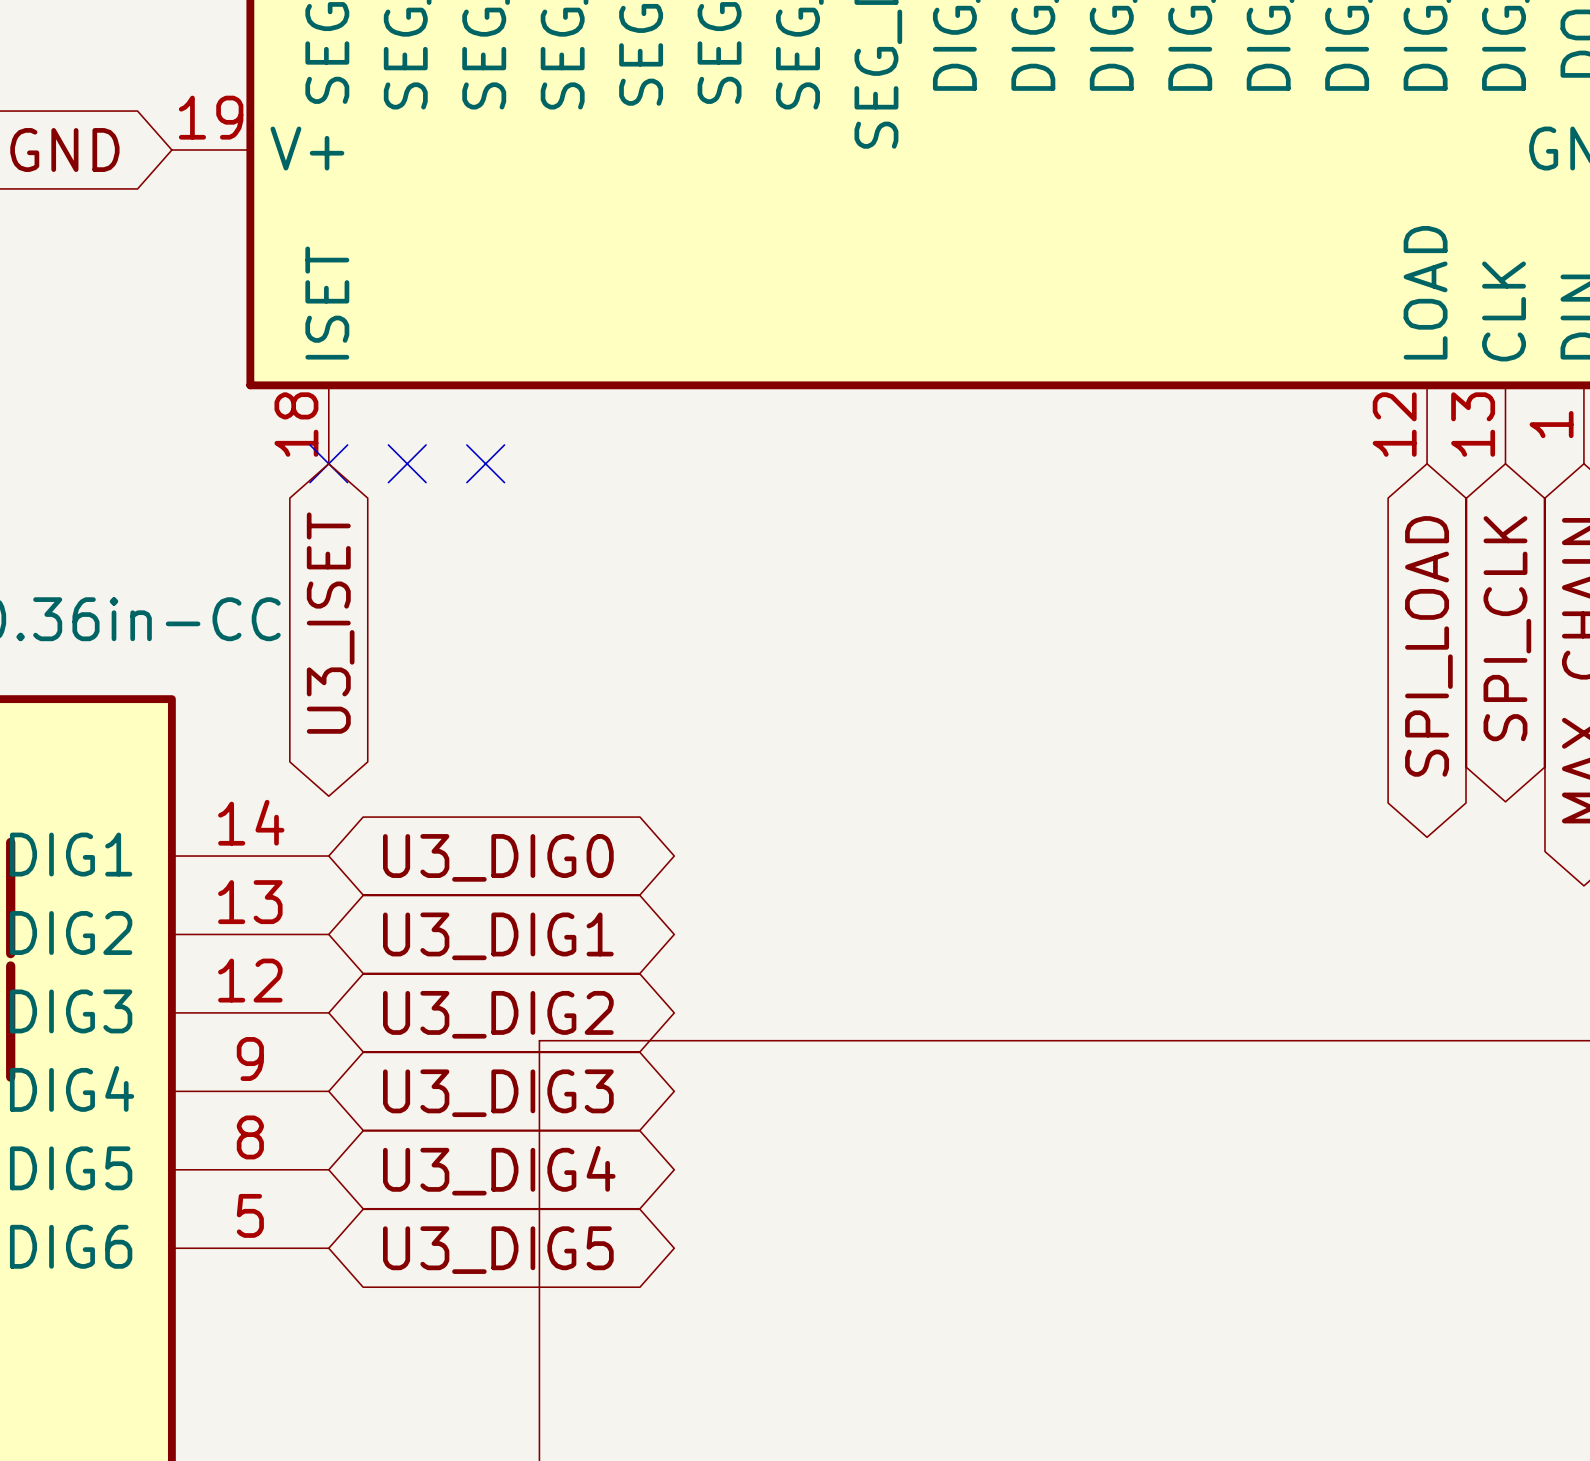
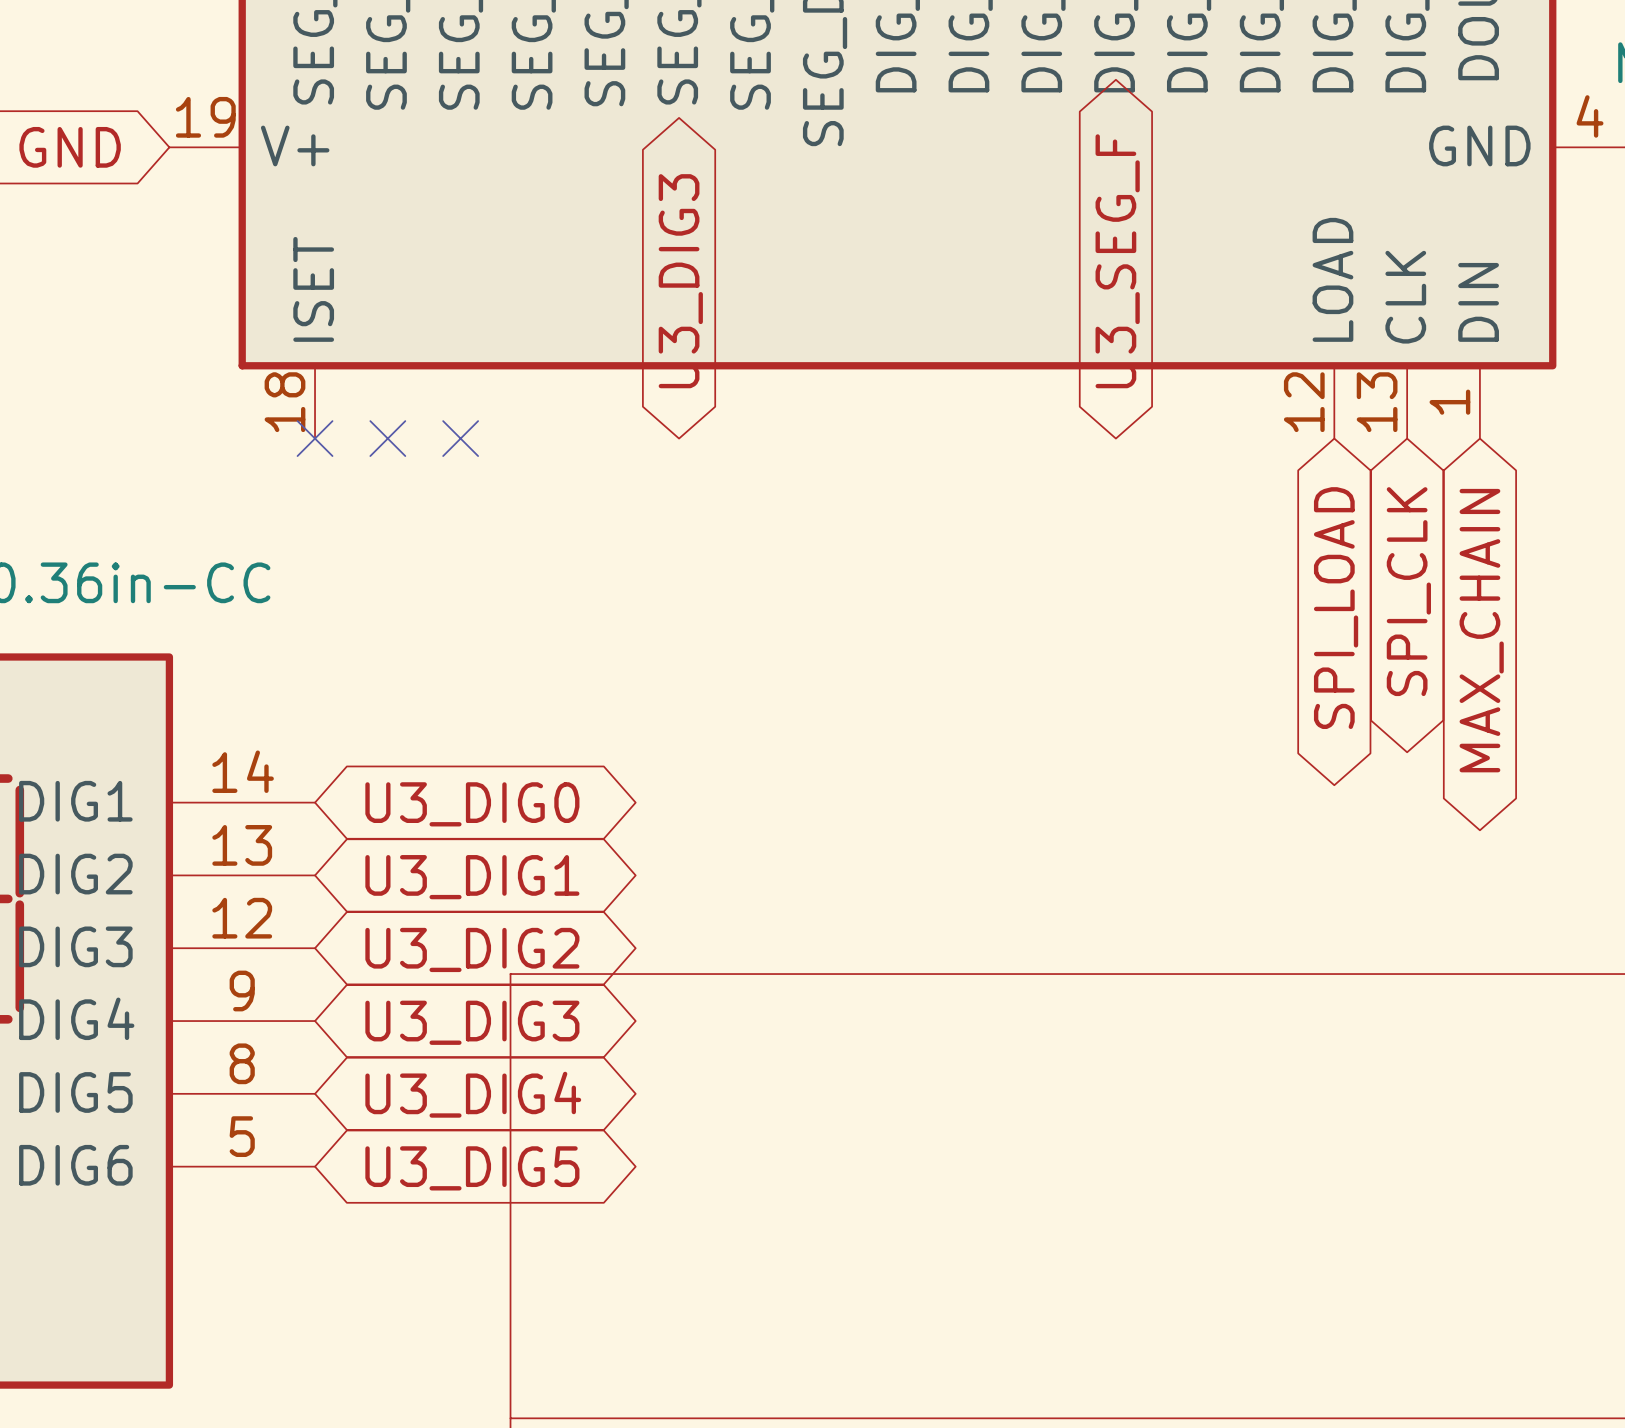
global label: none -> U3_SEG_F (1117, 261)
global label: none -> U3_DIG3 (680, 281)
global label: U3_ISET (330, 623) -> none

